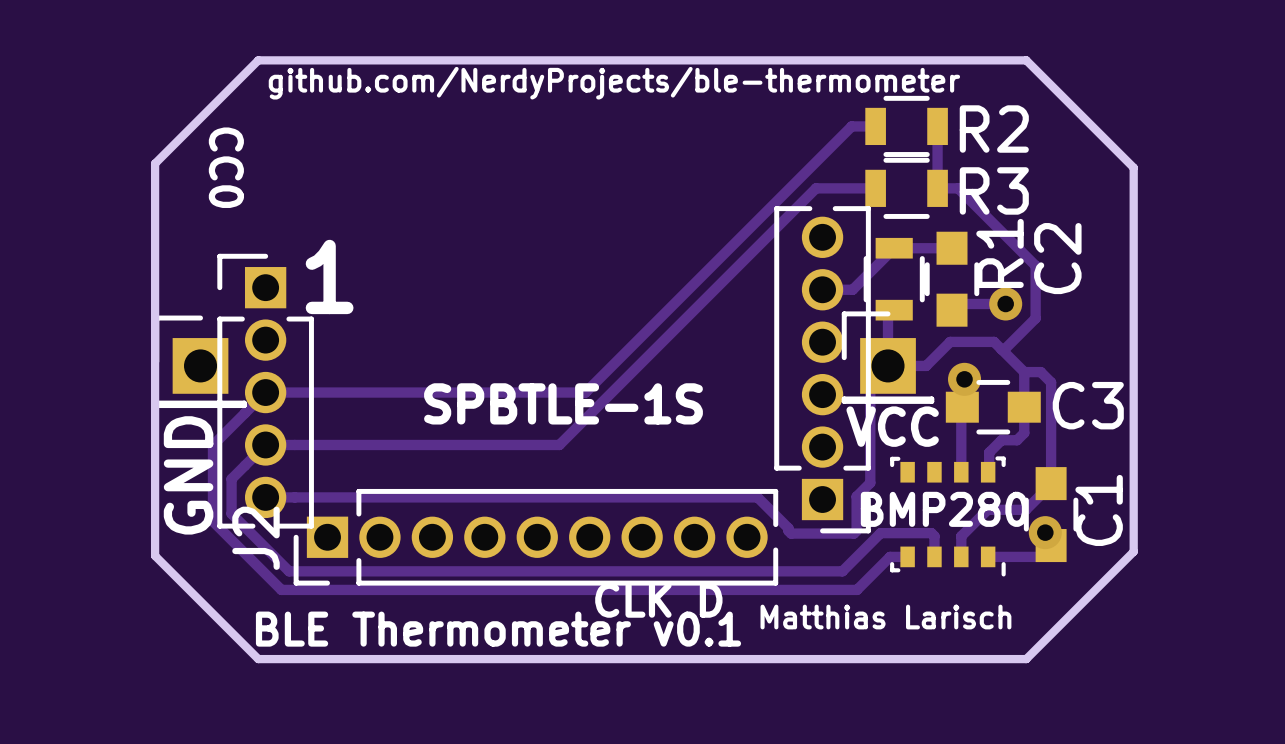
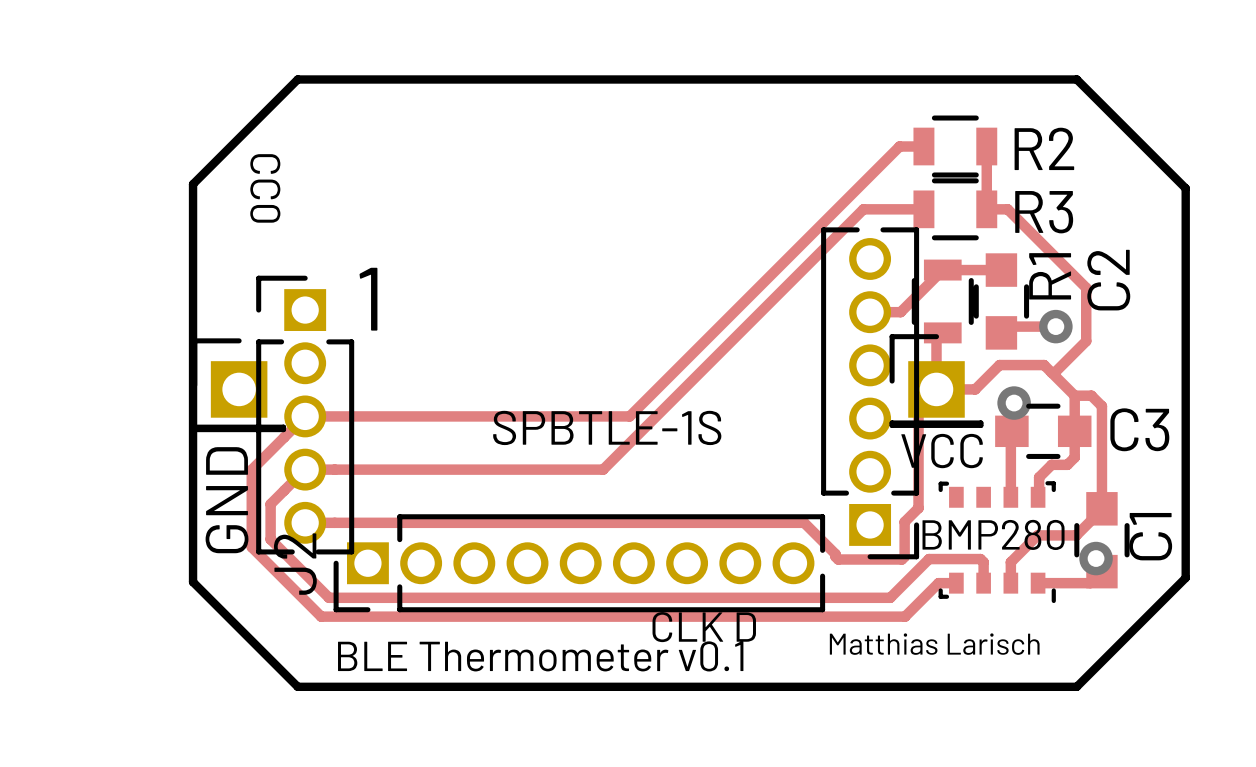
text: github.com/NerdyProjects/ble-thermometer (614, 83) -> none

